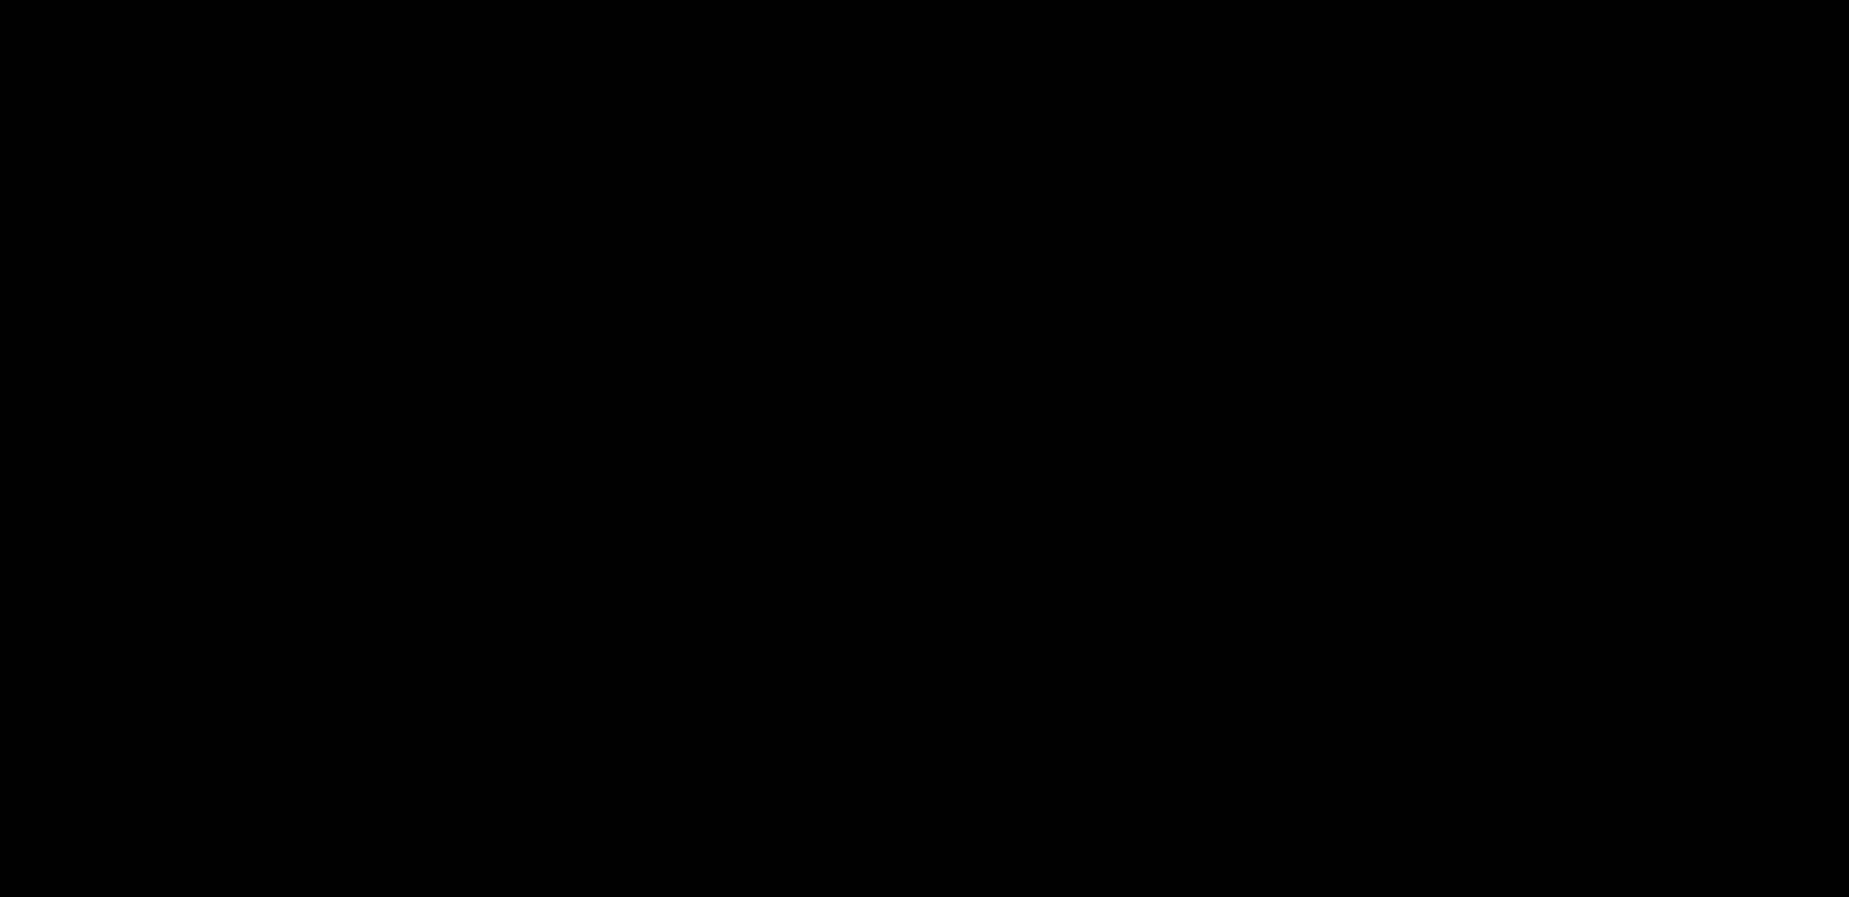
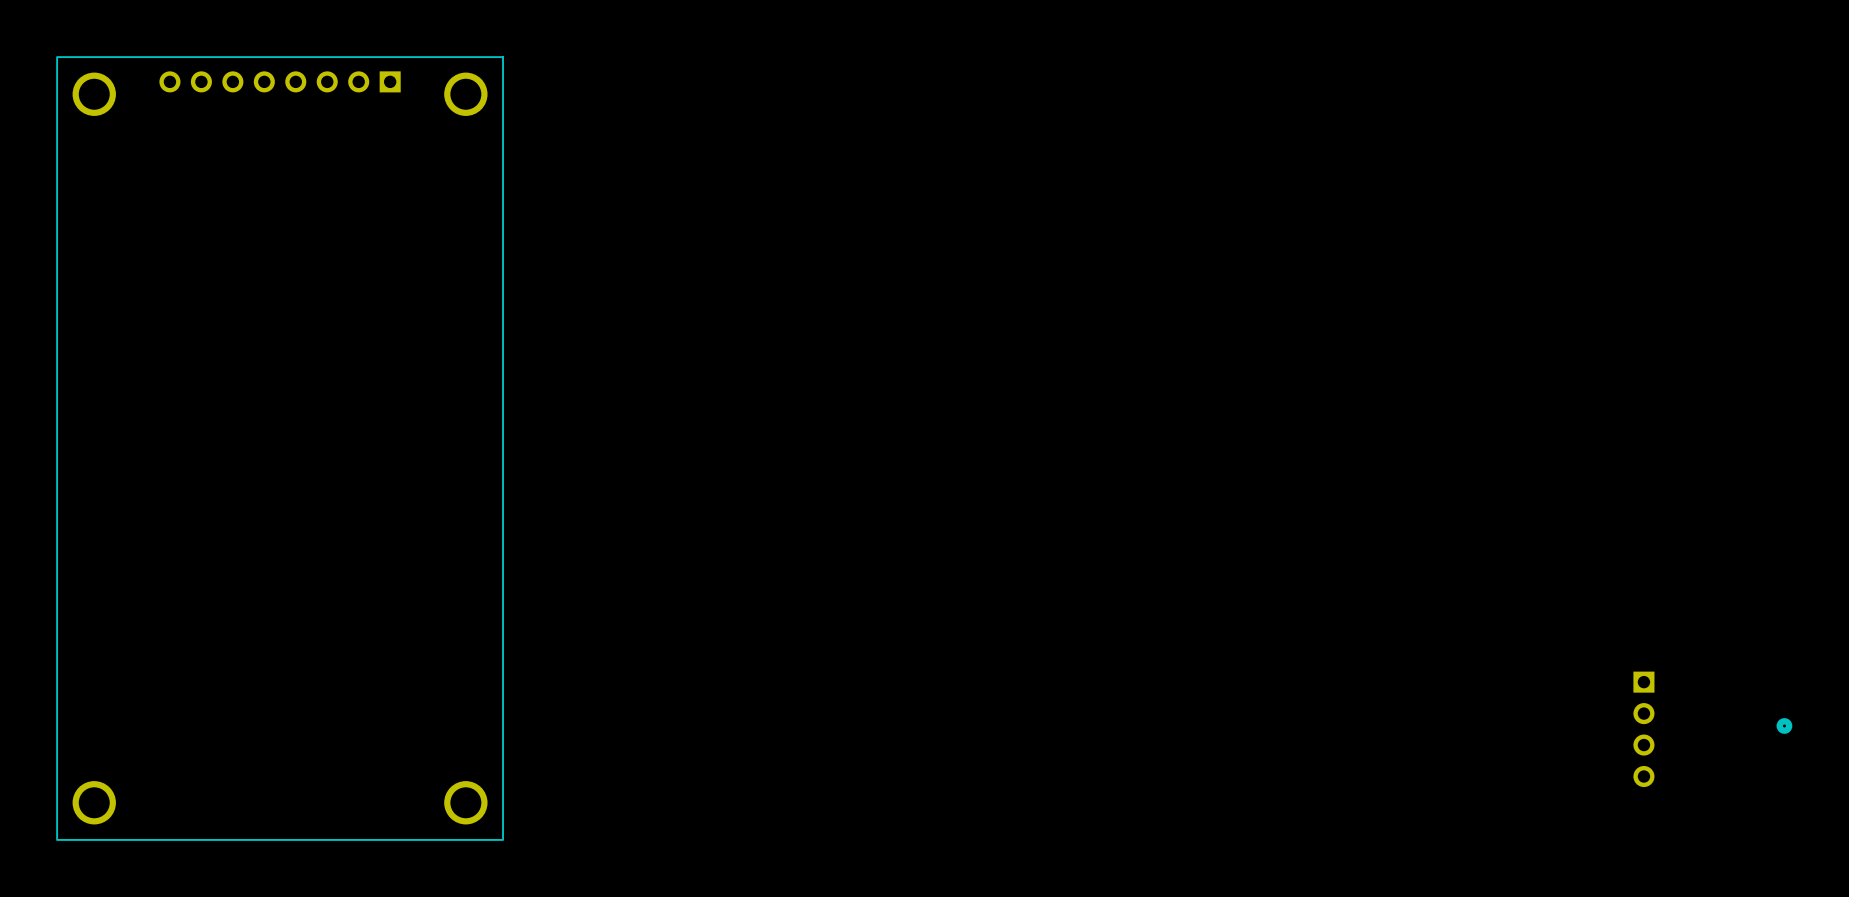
part: none -> (280, 448)
part: none -> (1784, 725)
part: none -> (1643, 729)

